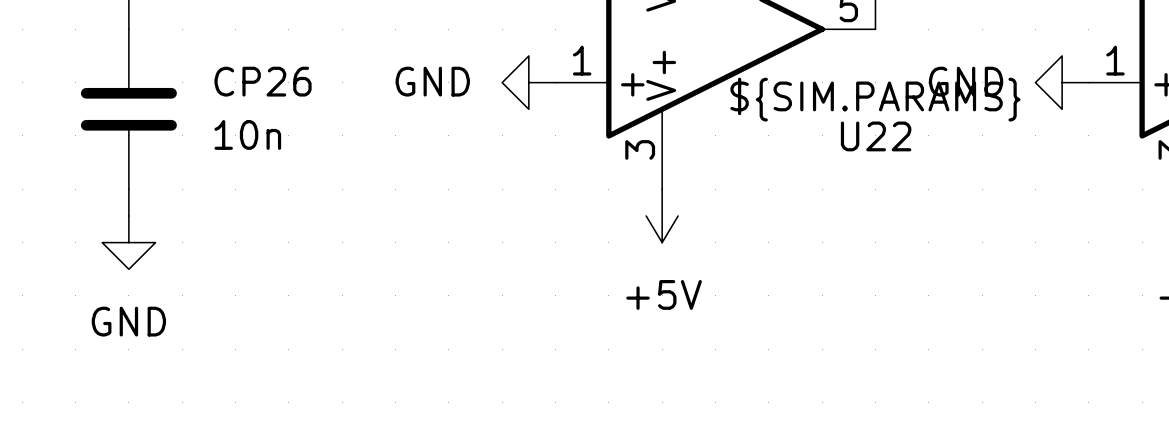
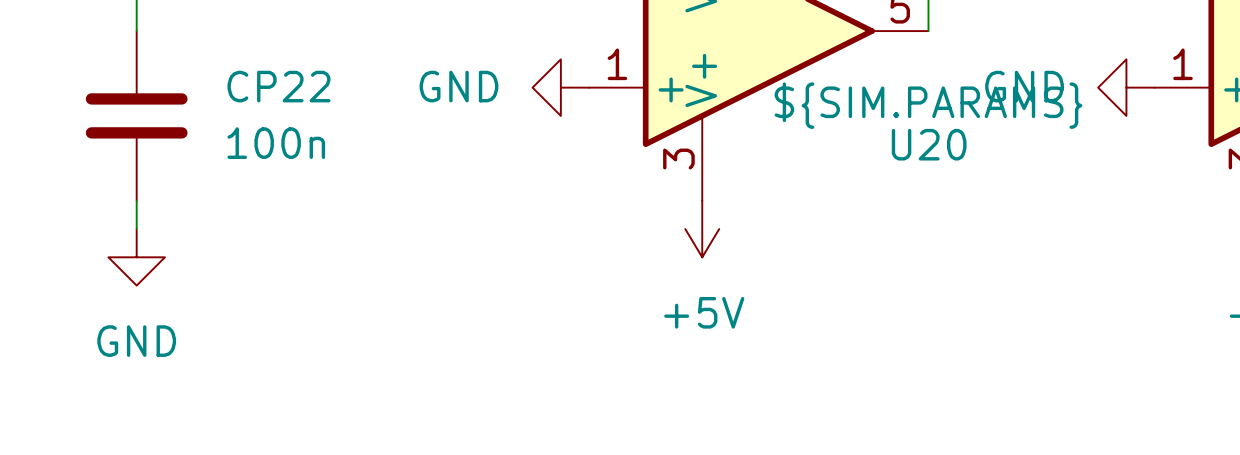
CP26 name: CP26 (263, 81) -> CP22 (278, 86)
CP26 value: 10n (247, 134) -> 100n (276, 143)
U22 name: U22 (876, 136) -> U20 (929, 144)

